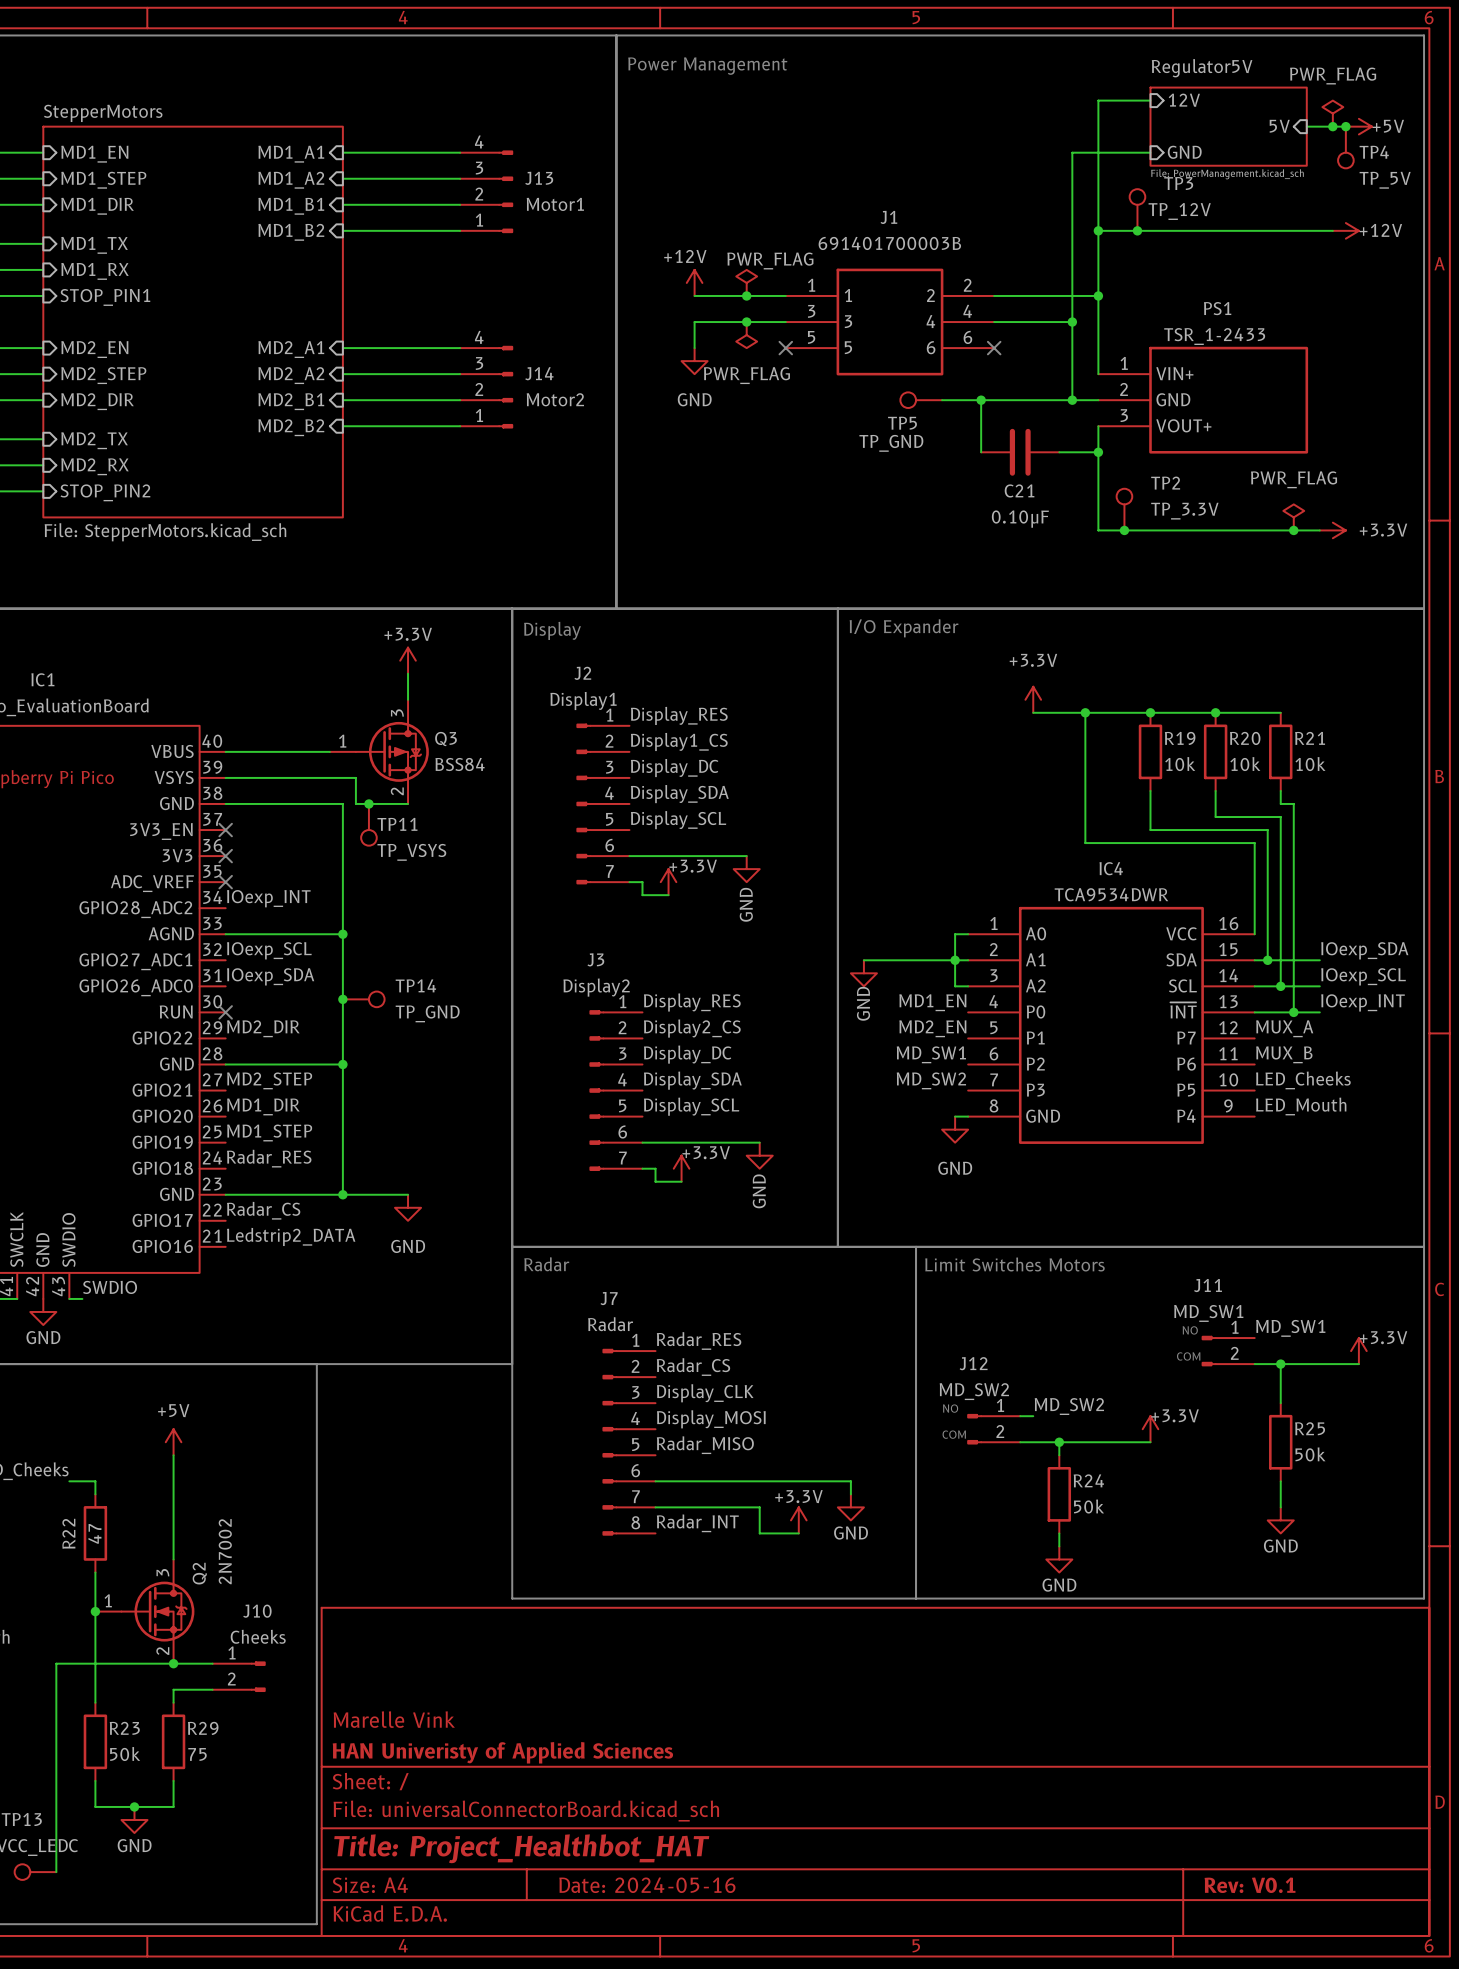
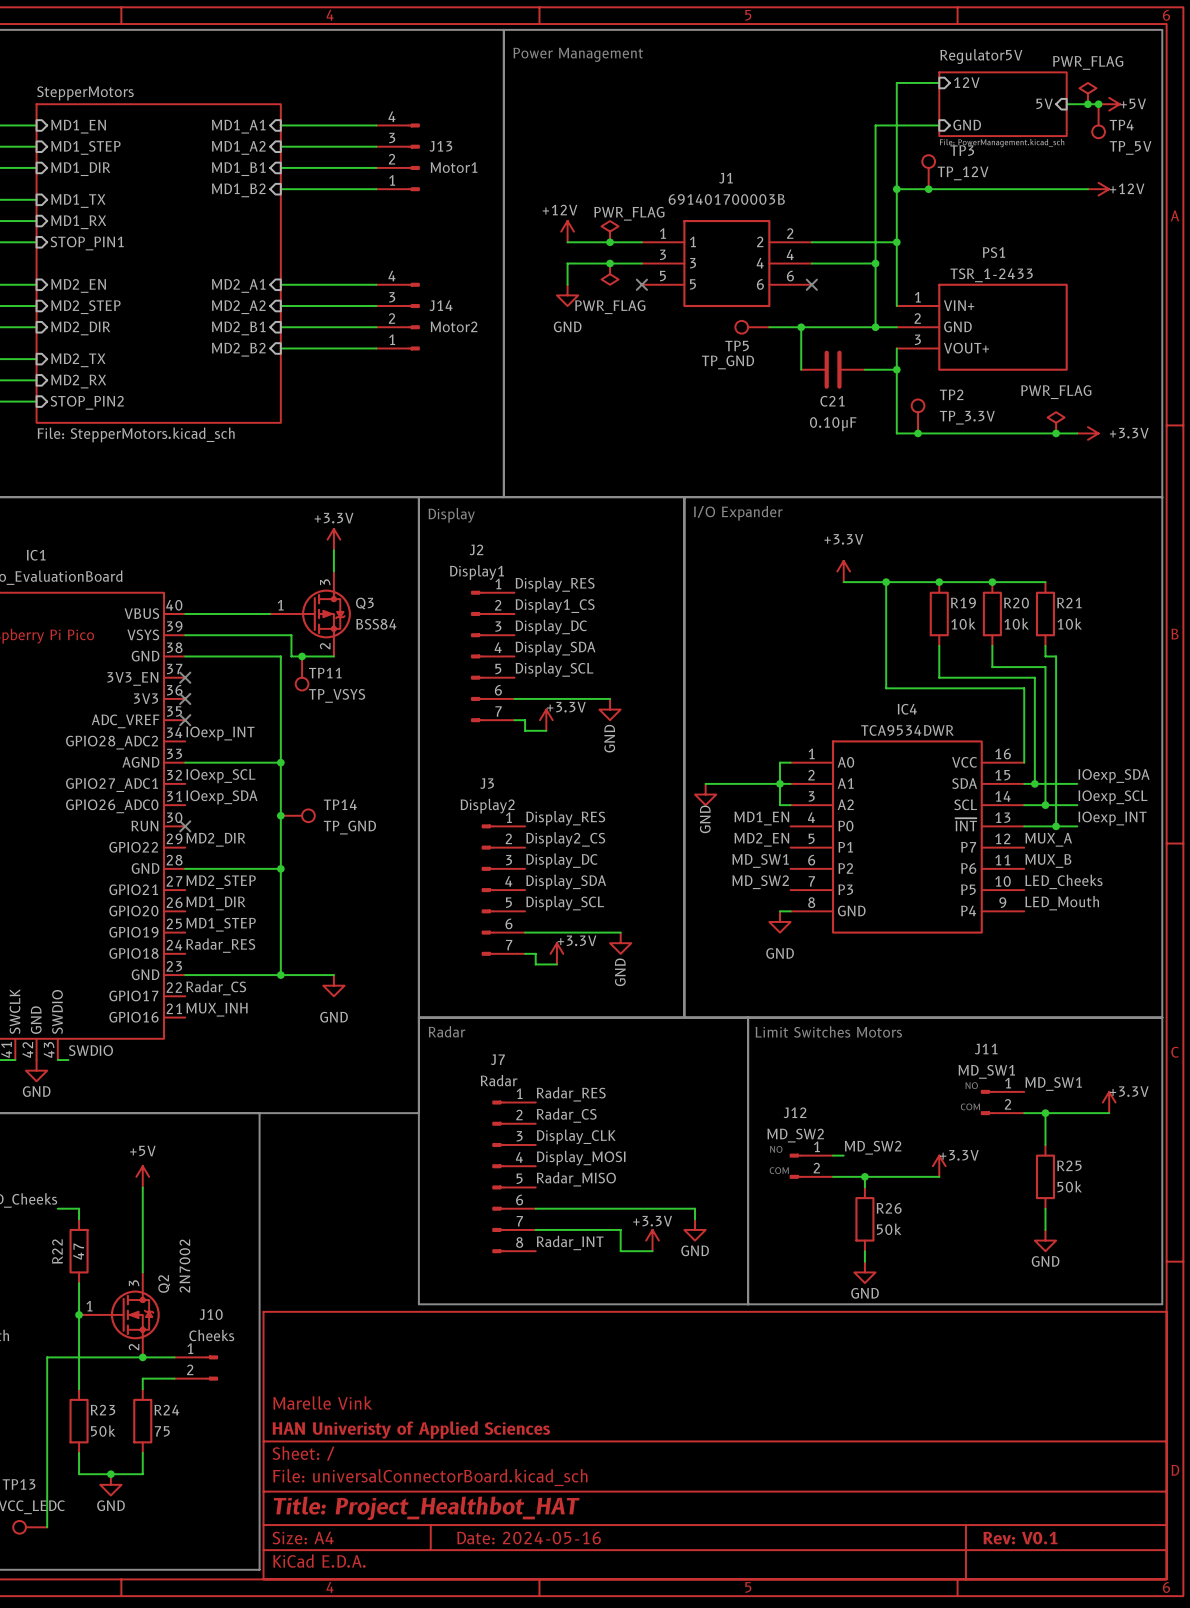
label: Ledstrip2_DATA (291, 1236) -> MUX_INH (217, 1009)
R24 name: R24 (1088, 1480) -> R26 (889, 1208)
R29 name: R29 (203, 1728) -> R24 (166, 1410)

